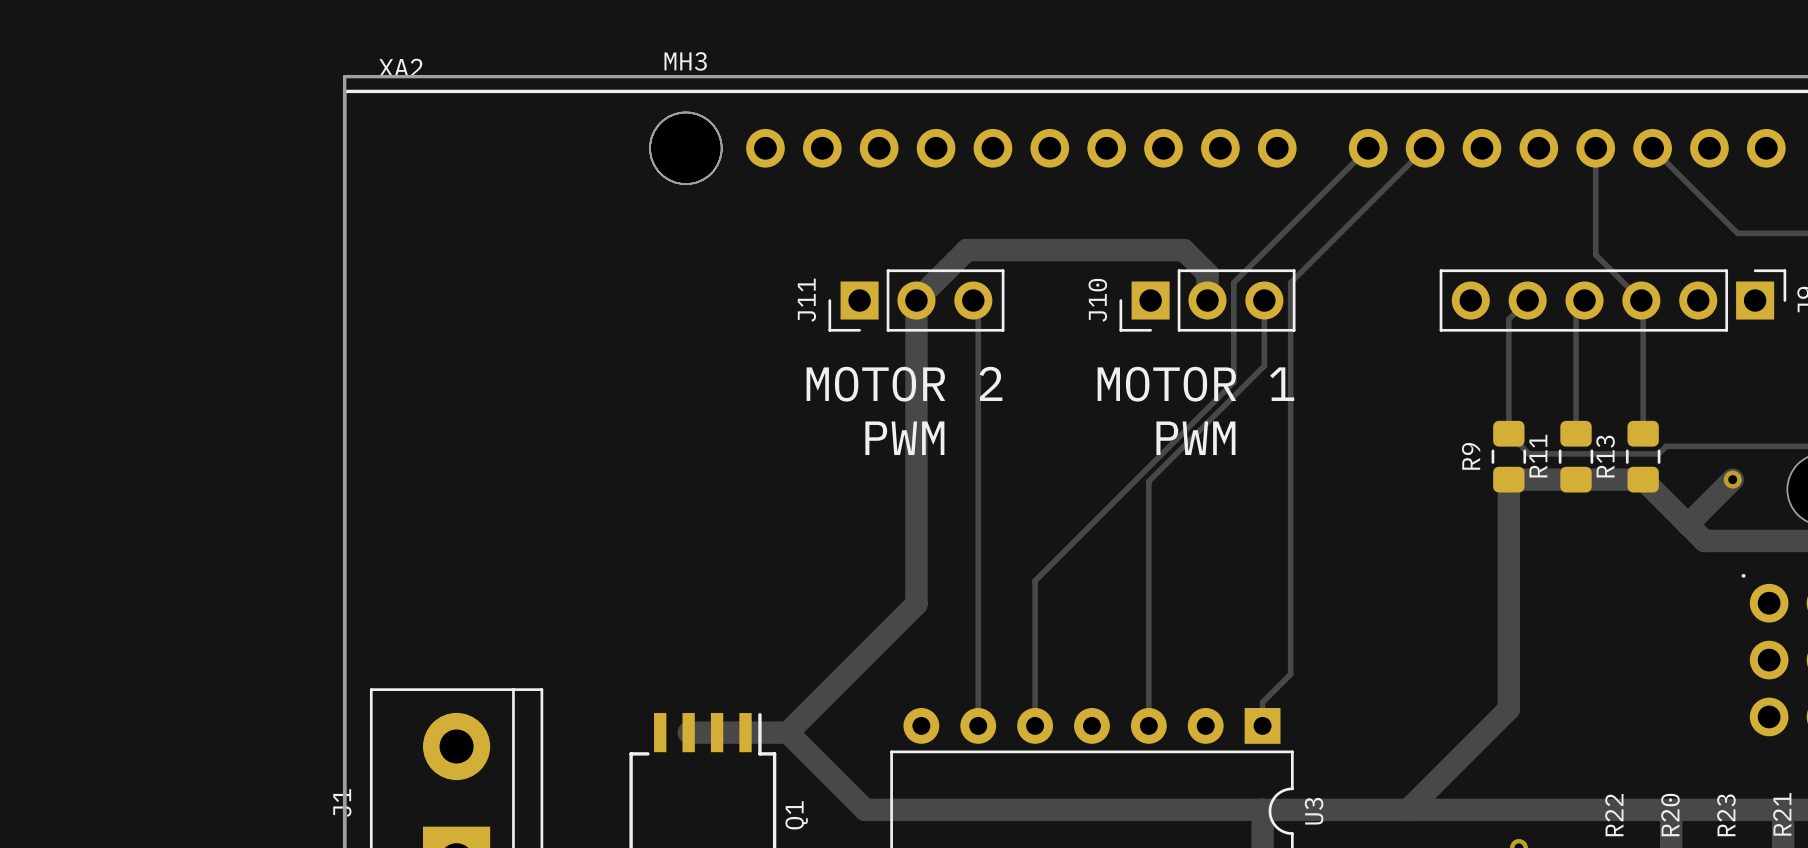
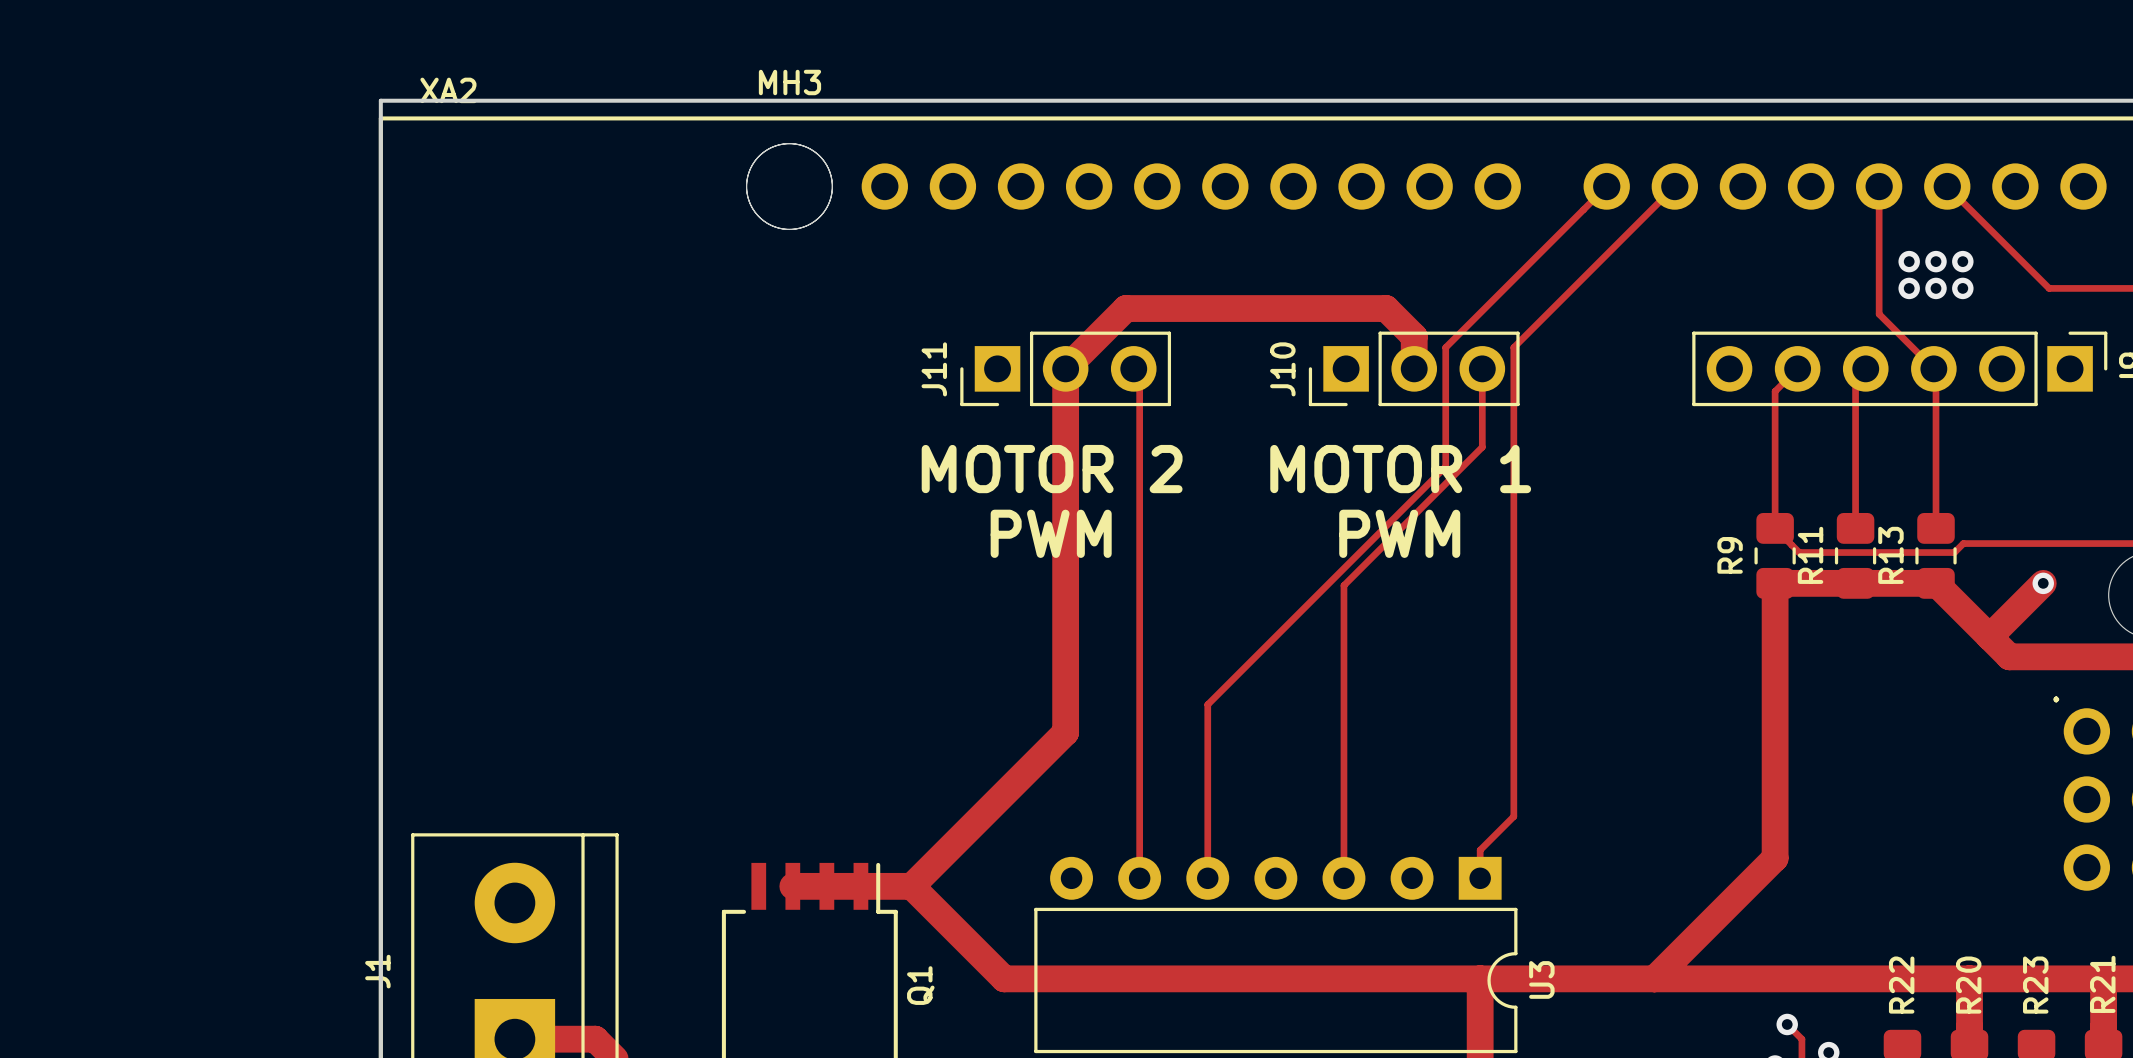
via: none -> (1909, 261)
via: none -> (1936, 261)
via: none -> (1962, 261)
via: none -> (1909, 288)
via: none -> (1936, 288)
via: none -> (1962, 288)

